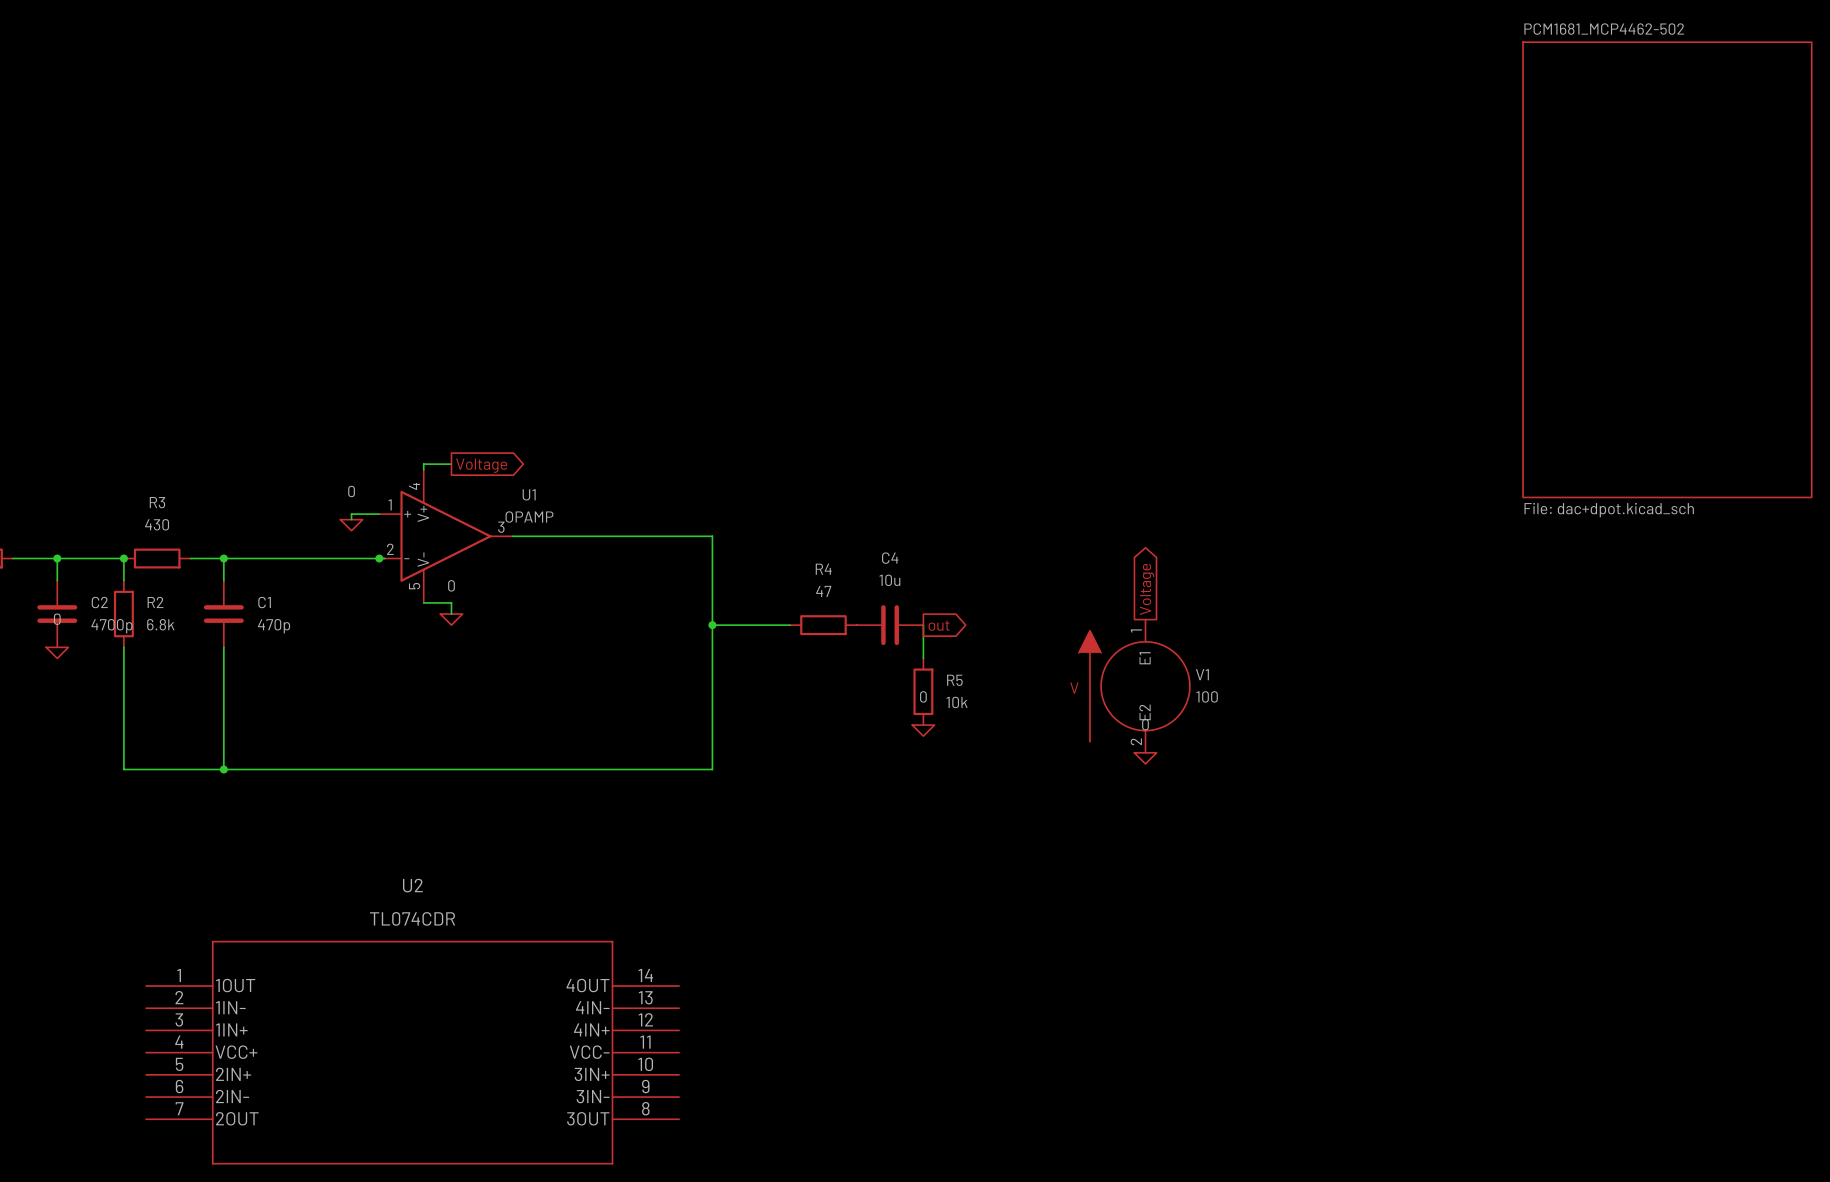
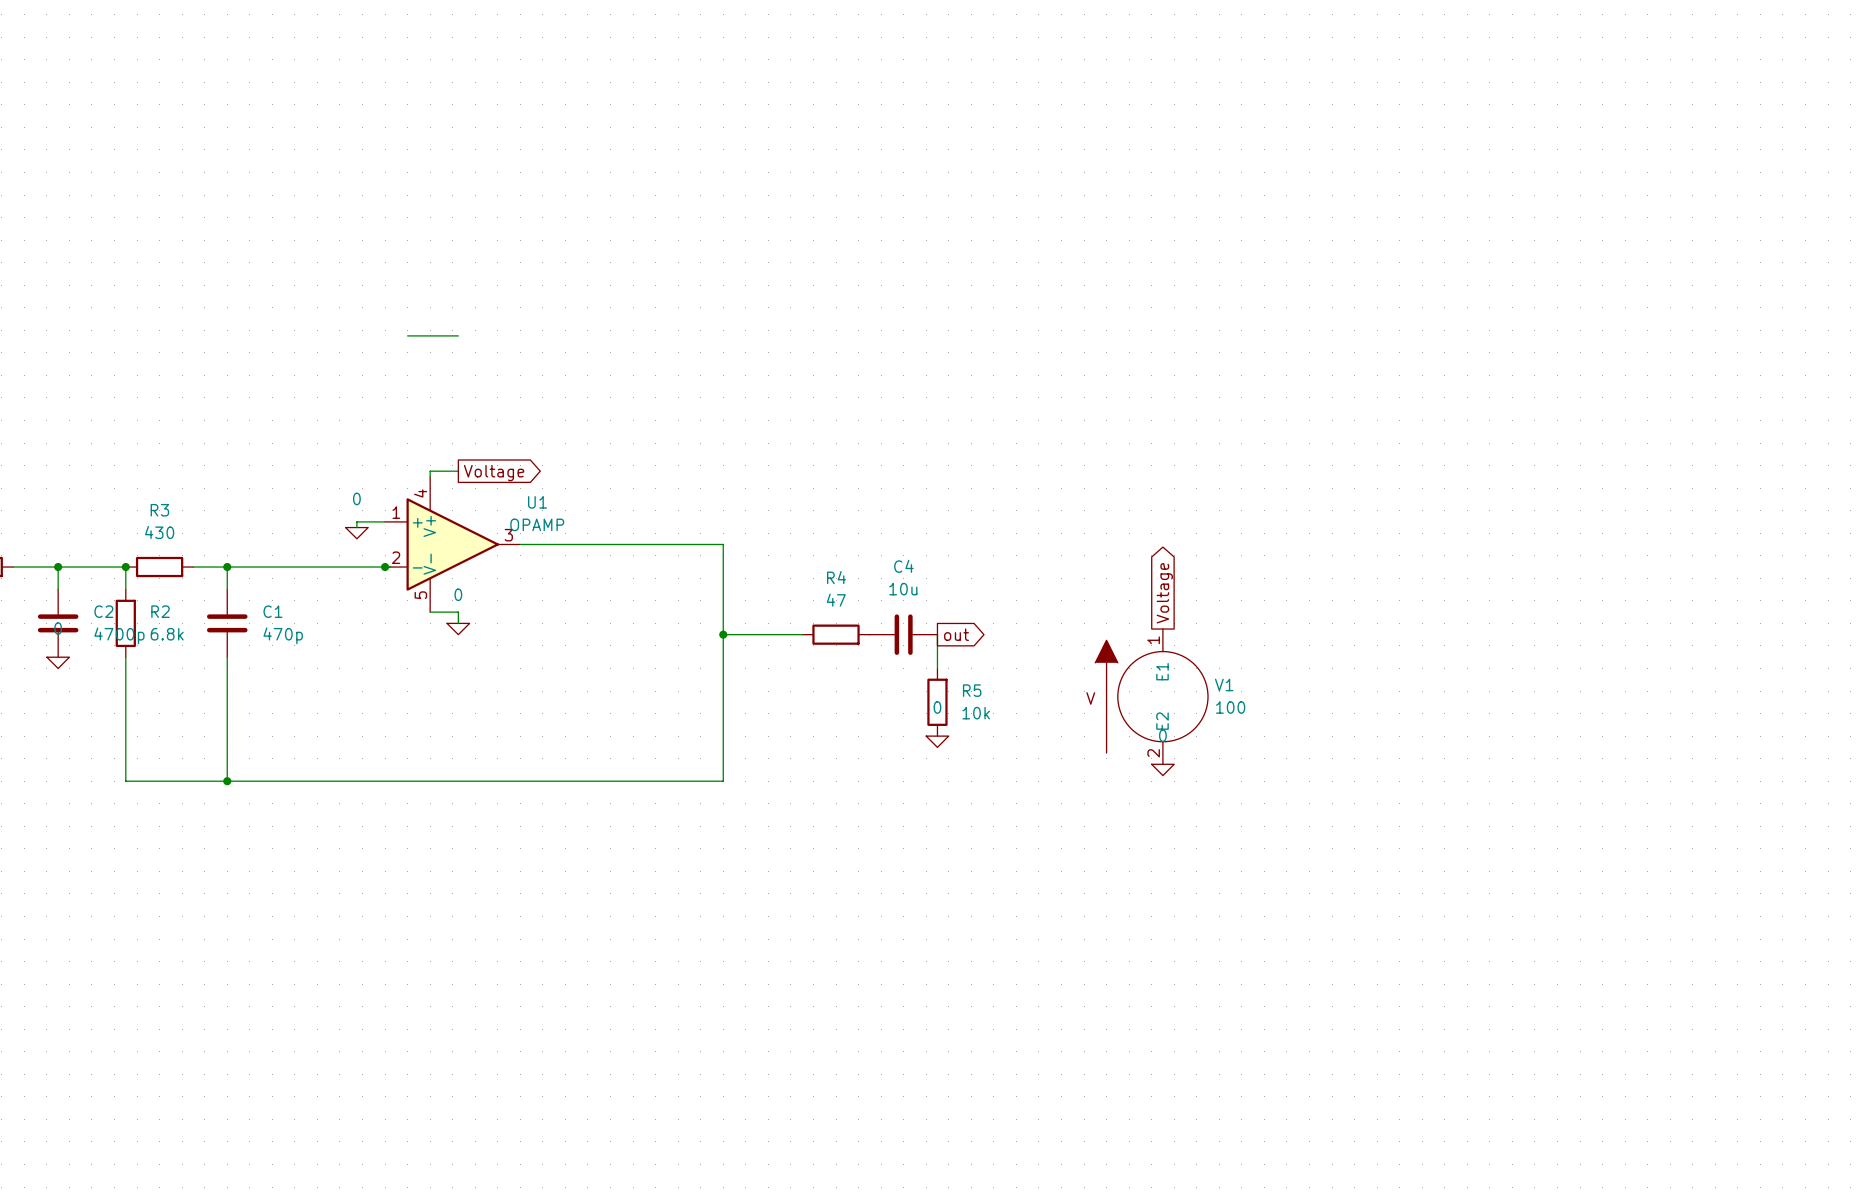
sheet PCM1681_MCP4462-502: File: dac+dpot.kicad_sch (1667, 269) -> none
wire: none -> (407, 335) (458, 335)
U2: TL074CDR (412, 1052) -> none

